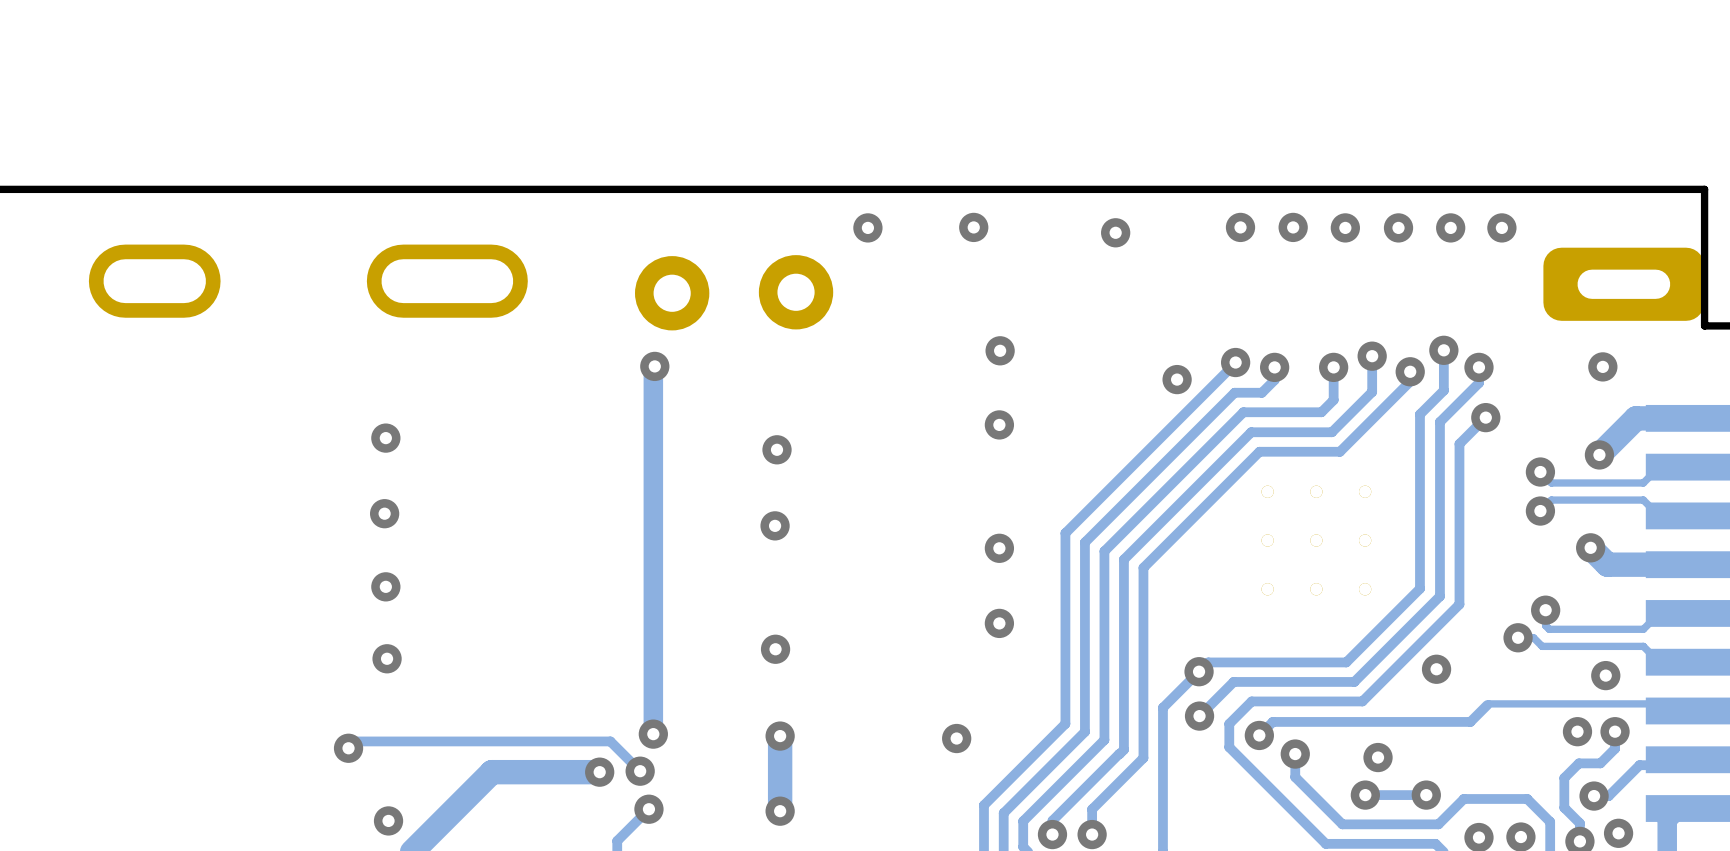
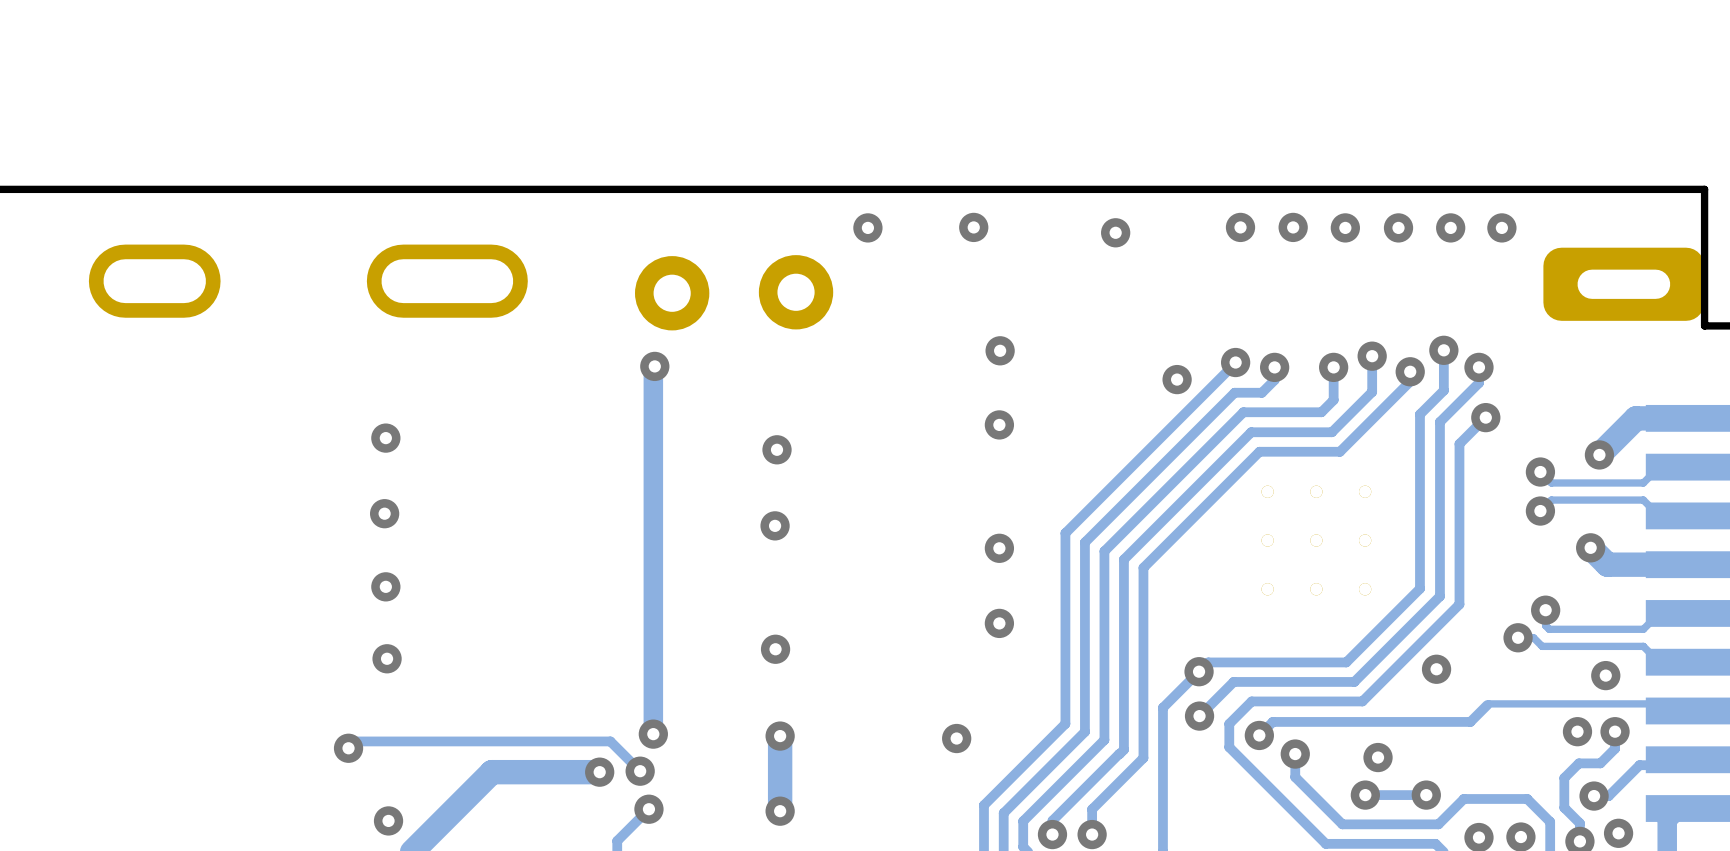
via: (1602, 366) -> none

